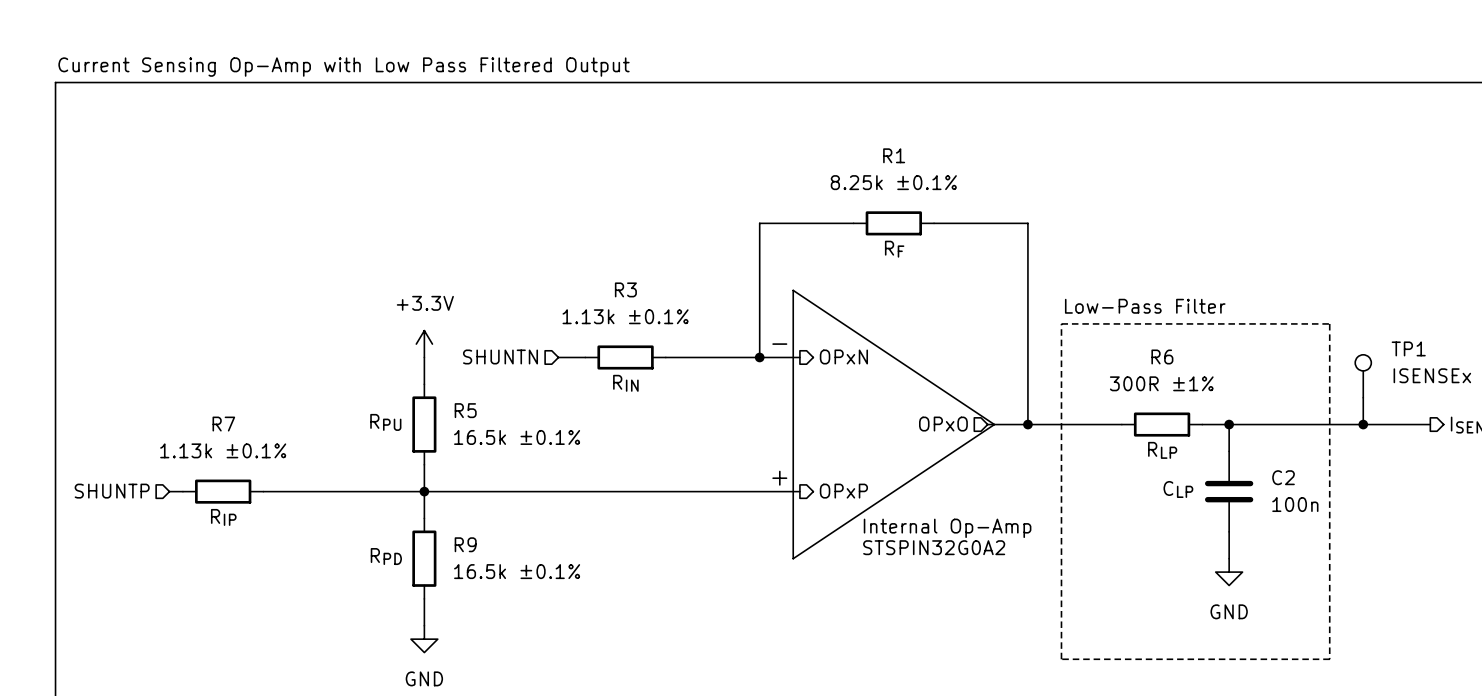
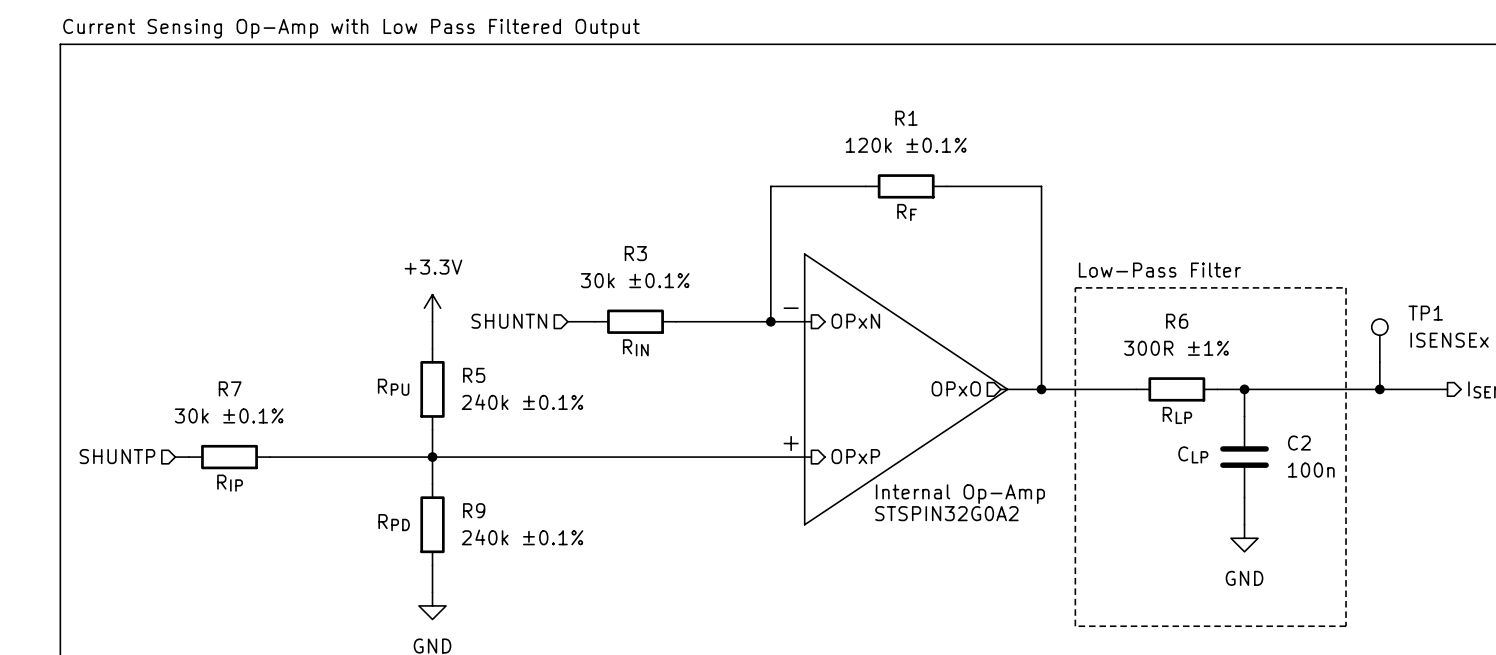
R1 value: 8.25k ±0.1% (893, 182) -> 120k ±0.1% (906, 145)
R3 value: 1.13k ±0.1% (625, 316) -> 30k ±0.1% (635, 280)
R5 value: 16.5k ±0.1% (517, 437) -> 240k ±0.1% (522, 402)
R7 value: 1.13k ±0.1% (223, 450) -> 30k ±0.1% (229, 415)
R9 value: 16.5k ±0.1% (517, 571) -> 240k ±0.1% (522, 537)

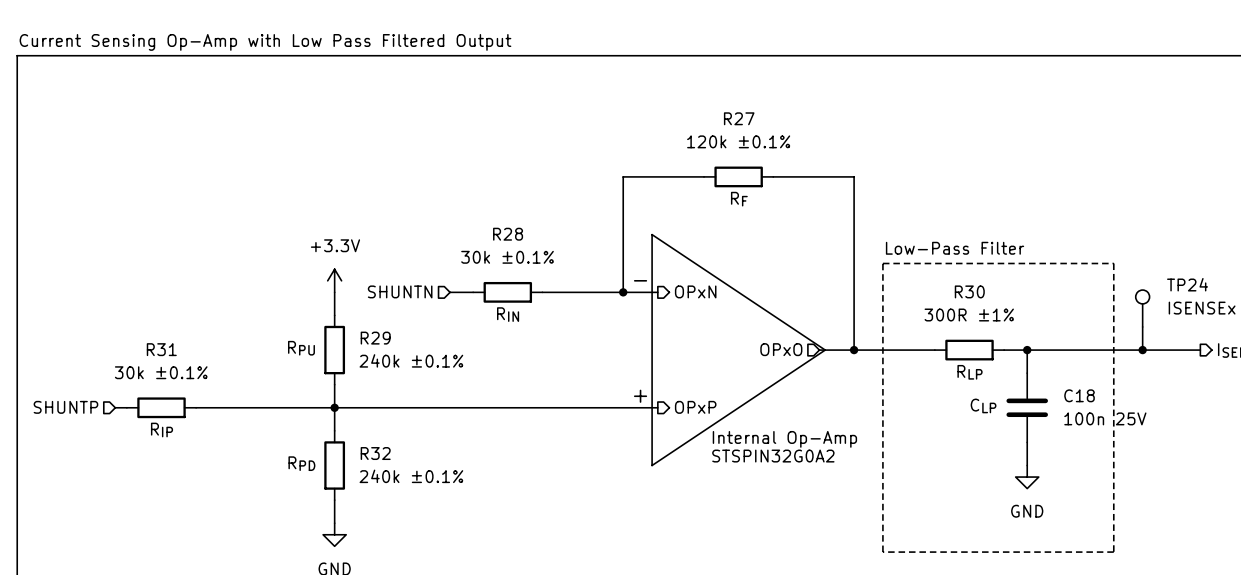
R1 name: R1 (906, 118) -> R27 (739, 118)
R3 name: R3 (635, 253) -> R28 (508, 234)
TP1 name: TP1 (1425, 313) -> TP24 (1187, 284)
R6 name: R6 (1177, 321) -> R30 (969, 291)
R5 name: R5 (474, 375) -> R29 (375, 338)
R7 name: R7 (230, 388) -> R31 (161, 349)
C2 name: C2 (1299, 443) -> C18 (1079, 395)
C2 value: 100n (1311, 470) -> 100n 25V (1105, 418)
R9 name: R9 (474, 510) -> R32 (375, 453)

